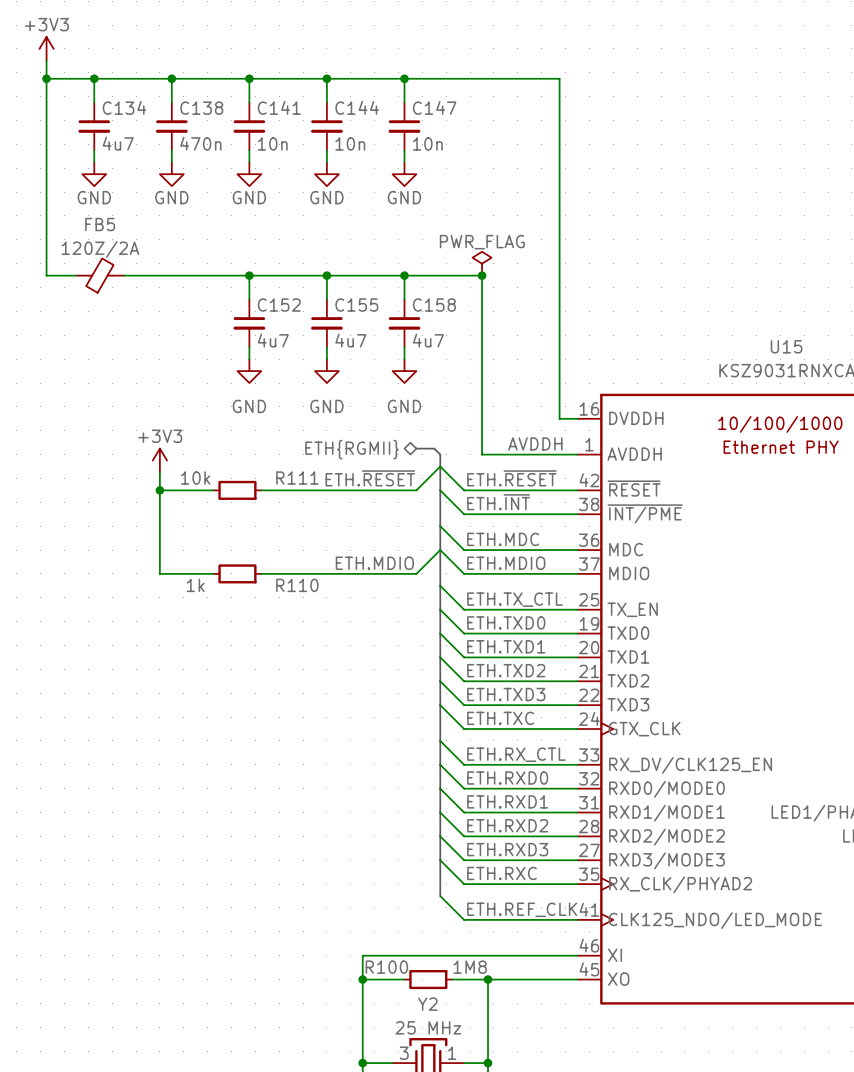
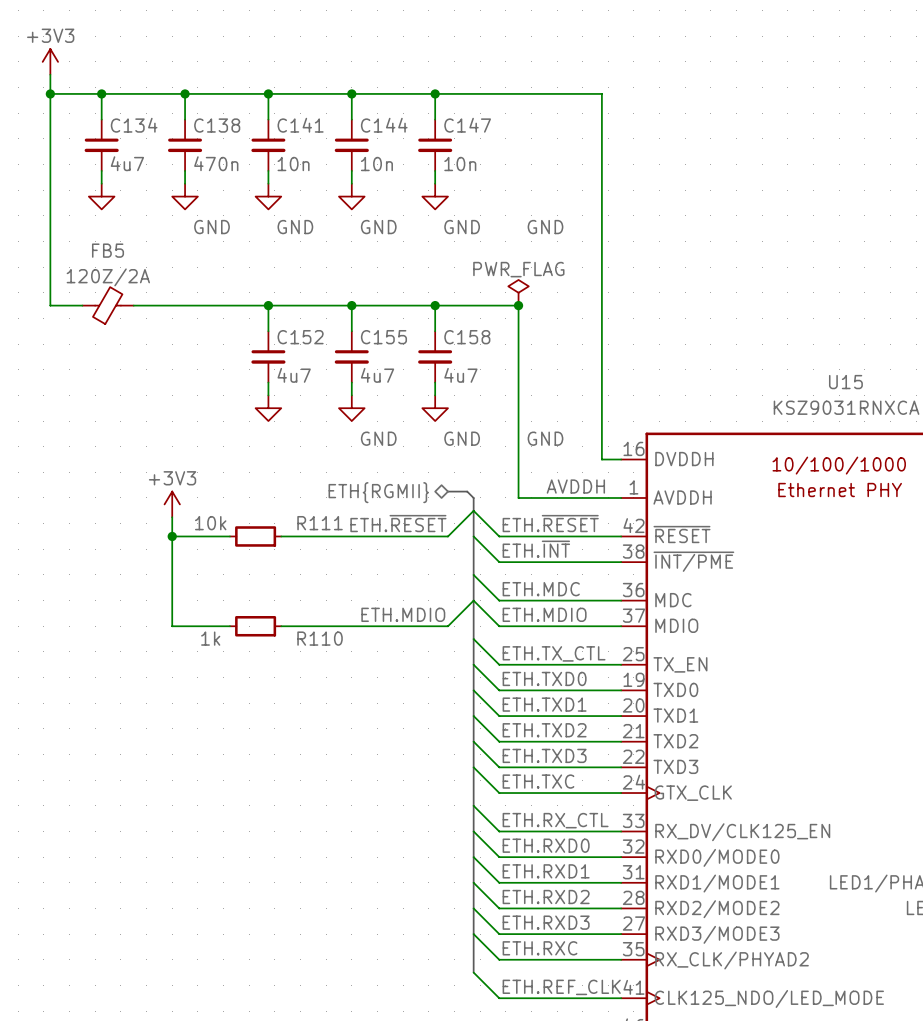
power symbol text position: GND (94, 197) -> GND (212, 227)
power symbol text position: GND (171, 197) -> GND (295, 227)
power symbol text position: GND (249, 197) -> GND (378, 227)
power symbol text position: GND (326, 197) -> GND (462, 227)
power symbol text position: GND (404, 197) -> GND (545, 227)
power symbol text position: GND (249, 406) -> GND (378, 438)
power symbol text position: GND (326, 406) -> GND (462, 438)
power symbol text position: GND (404, 406) -> GND (545, 438)

